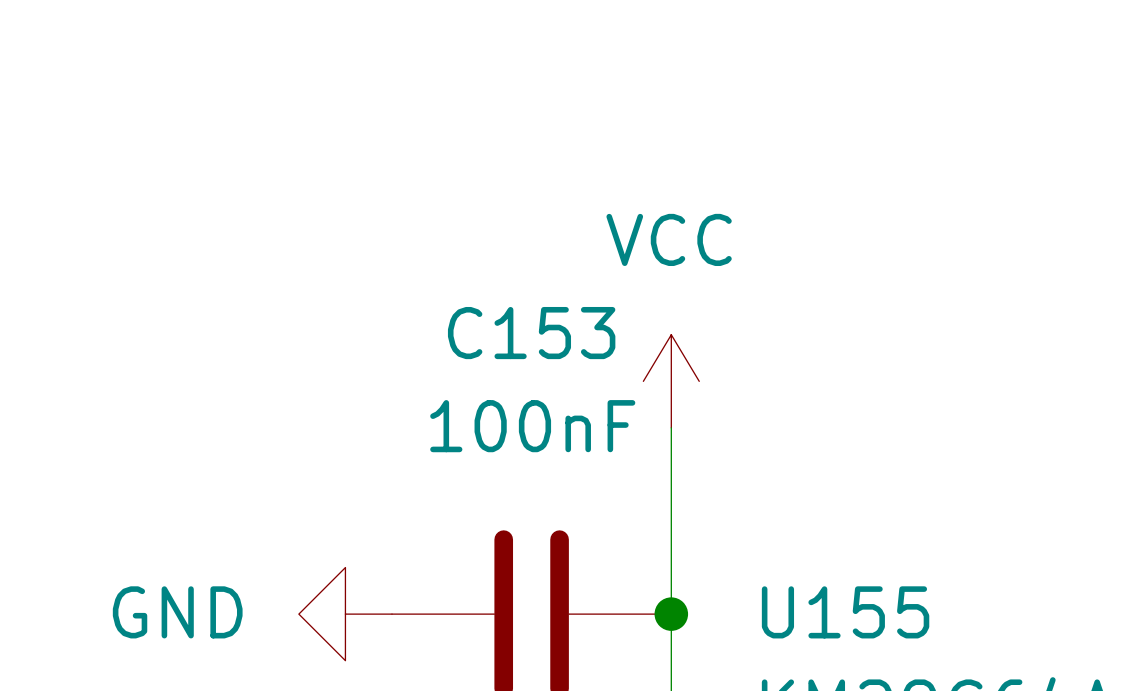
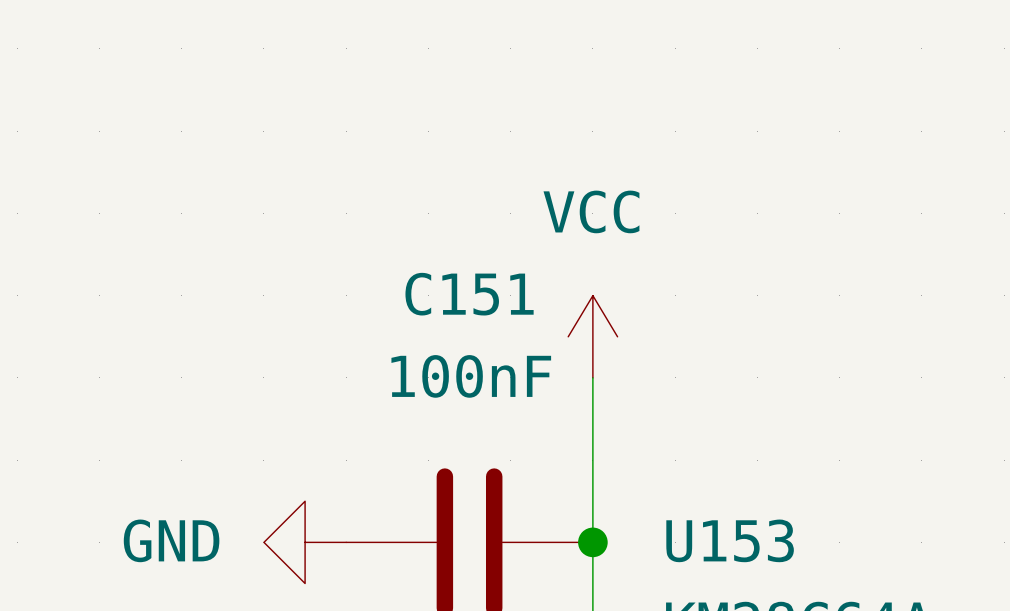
C153 name: C153 (531, 333) -> C151 (469, 294)
U155 name: U155 (845, 612) -> U153 (730, 540)

